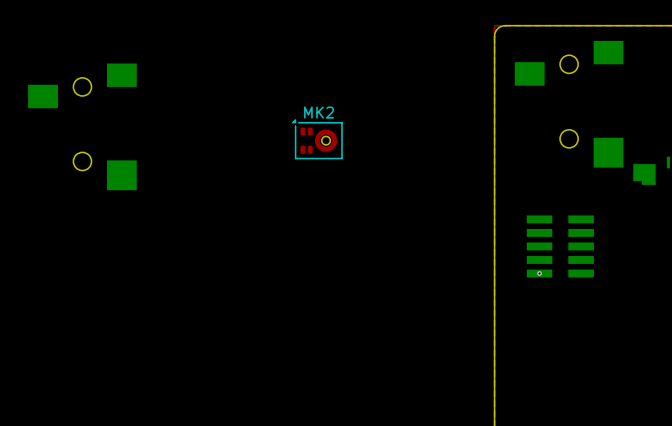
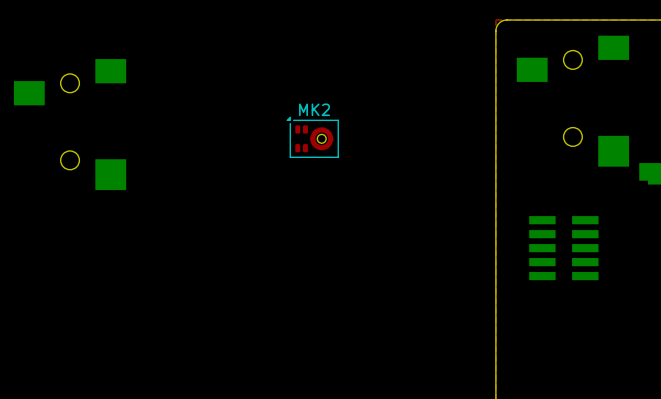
via: (539, 273) -> none

